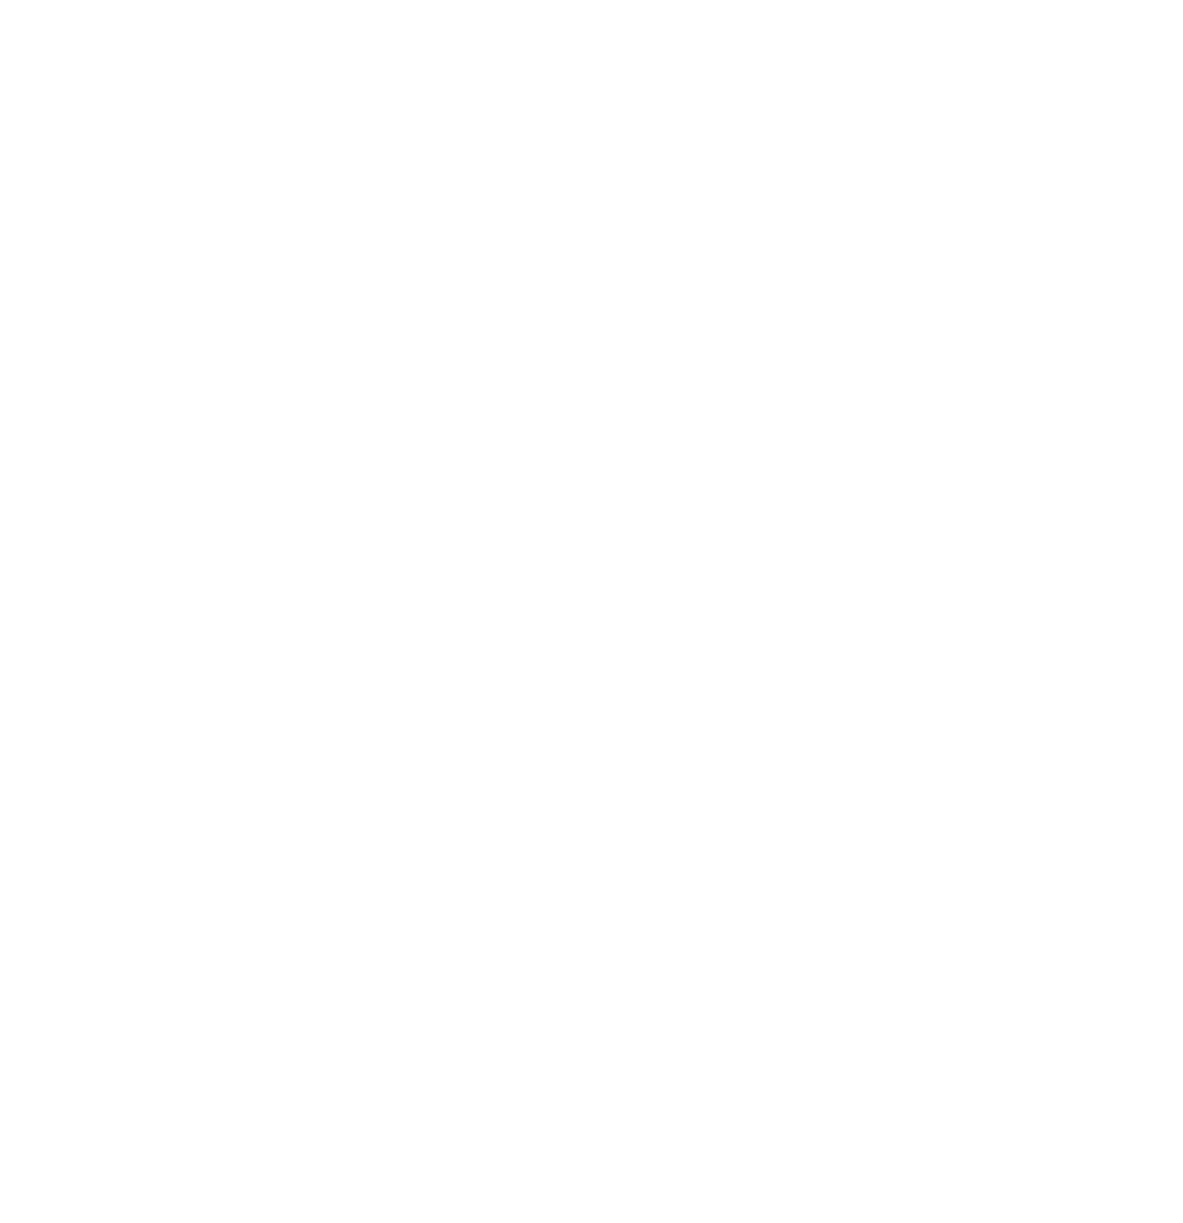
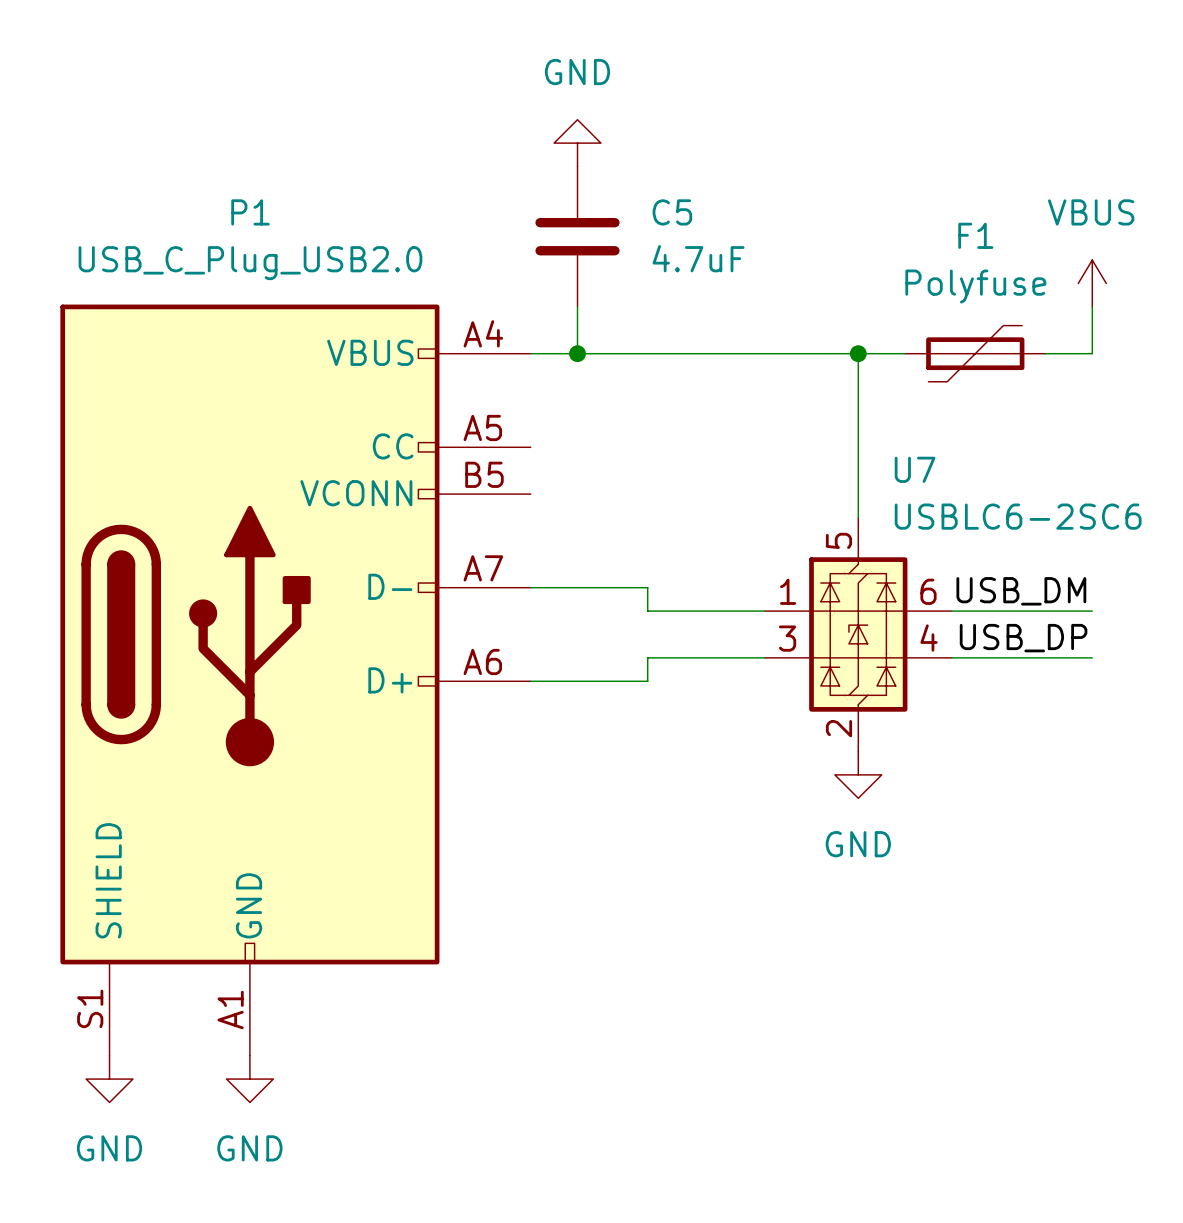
power symbol: none -> GND (577, 143)
C5: none -> 4.7uF (577, 236)
power symbol: none -> VBUS (1092, 283)
wire: none -> (577, 306) (577, 353)
wire: none -> (1092, 306) (1092, 353) (1045, 353)
wire: none -> (530, 353) (905, 353)
junction: none -> (577, 353)
wire: none -> (858, 353) (858, 517)
junction: none -> (858, 353)
F1: none -> Polyfuse (975, 353)
wire: none -> (530, 587) (647, 587) (647, 611) (764, 611)
label: none -> USB_DM (1021, 591)
wire: none -> (951, 611) (1092, 611)
U7: none -> USBLC6-2SC6 (858, 634)
label: none -> USB_DP (1023, 638)
wire: none -> (764, 657) (647, 657) (647, 681) (530, 681)
wire: none -> (951, 657) (1092, 657)
P1: none -> USB_C_Plug_USB2.0 (295, 680)
power symbol: none -> GND (858, 774)
power symbol: none -> GND (109, 1079)
power symbol: none -> GND (249, 1079)

